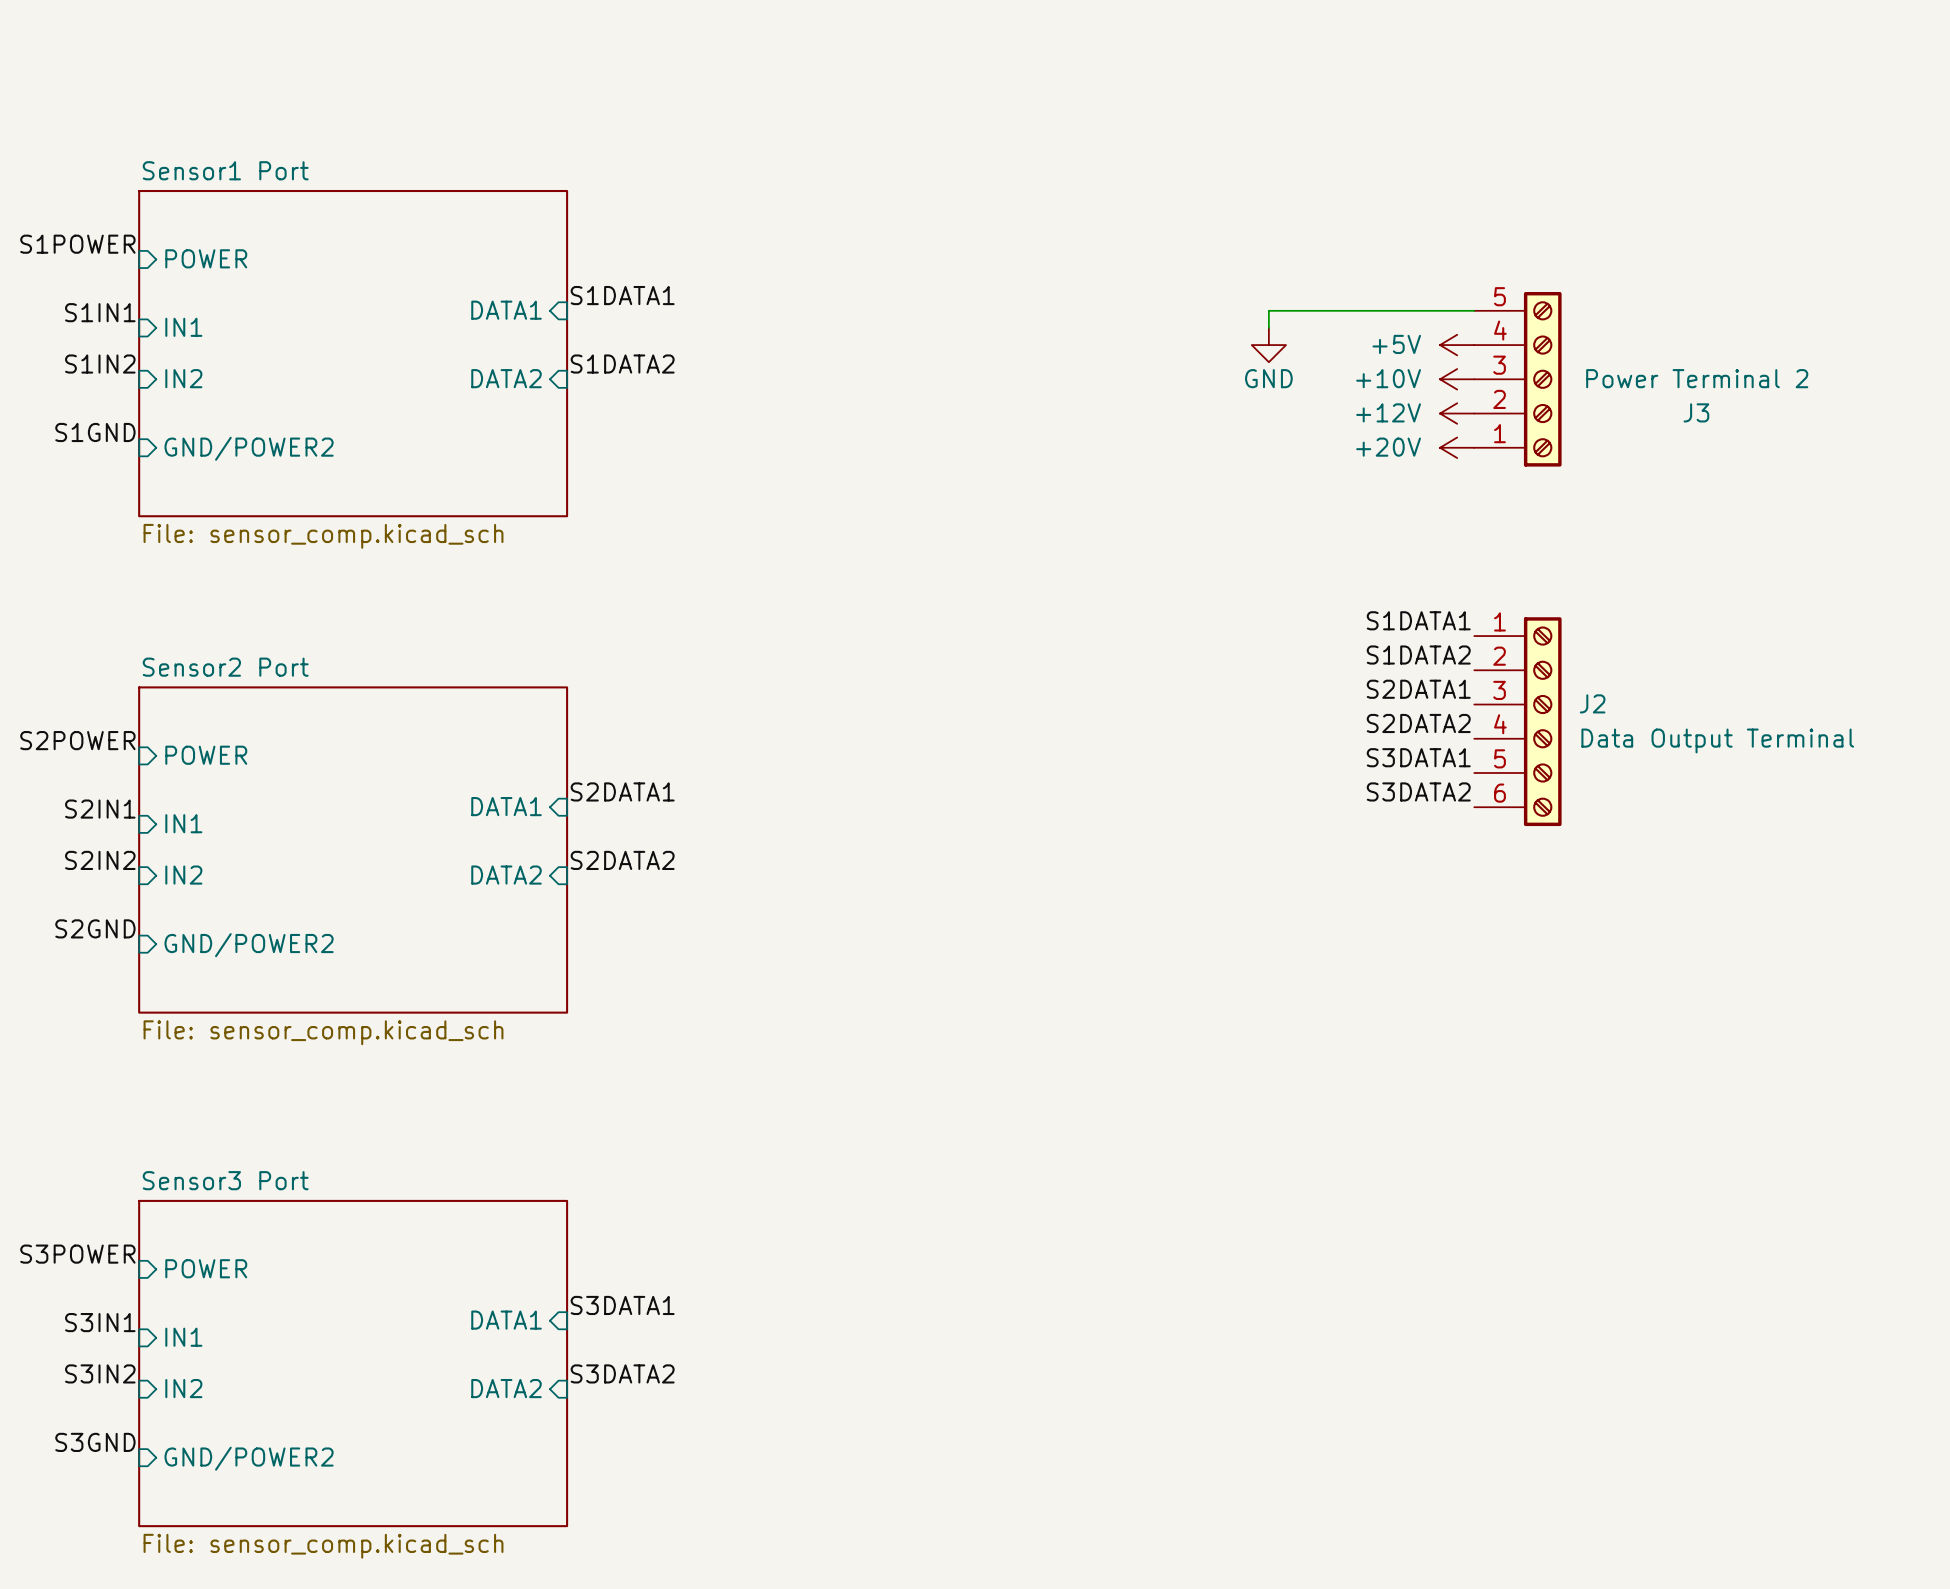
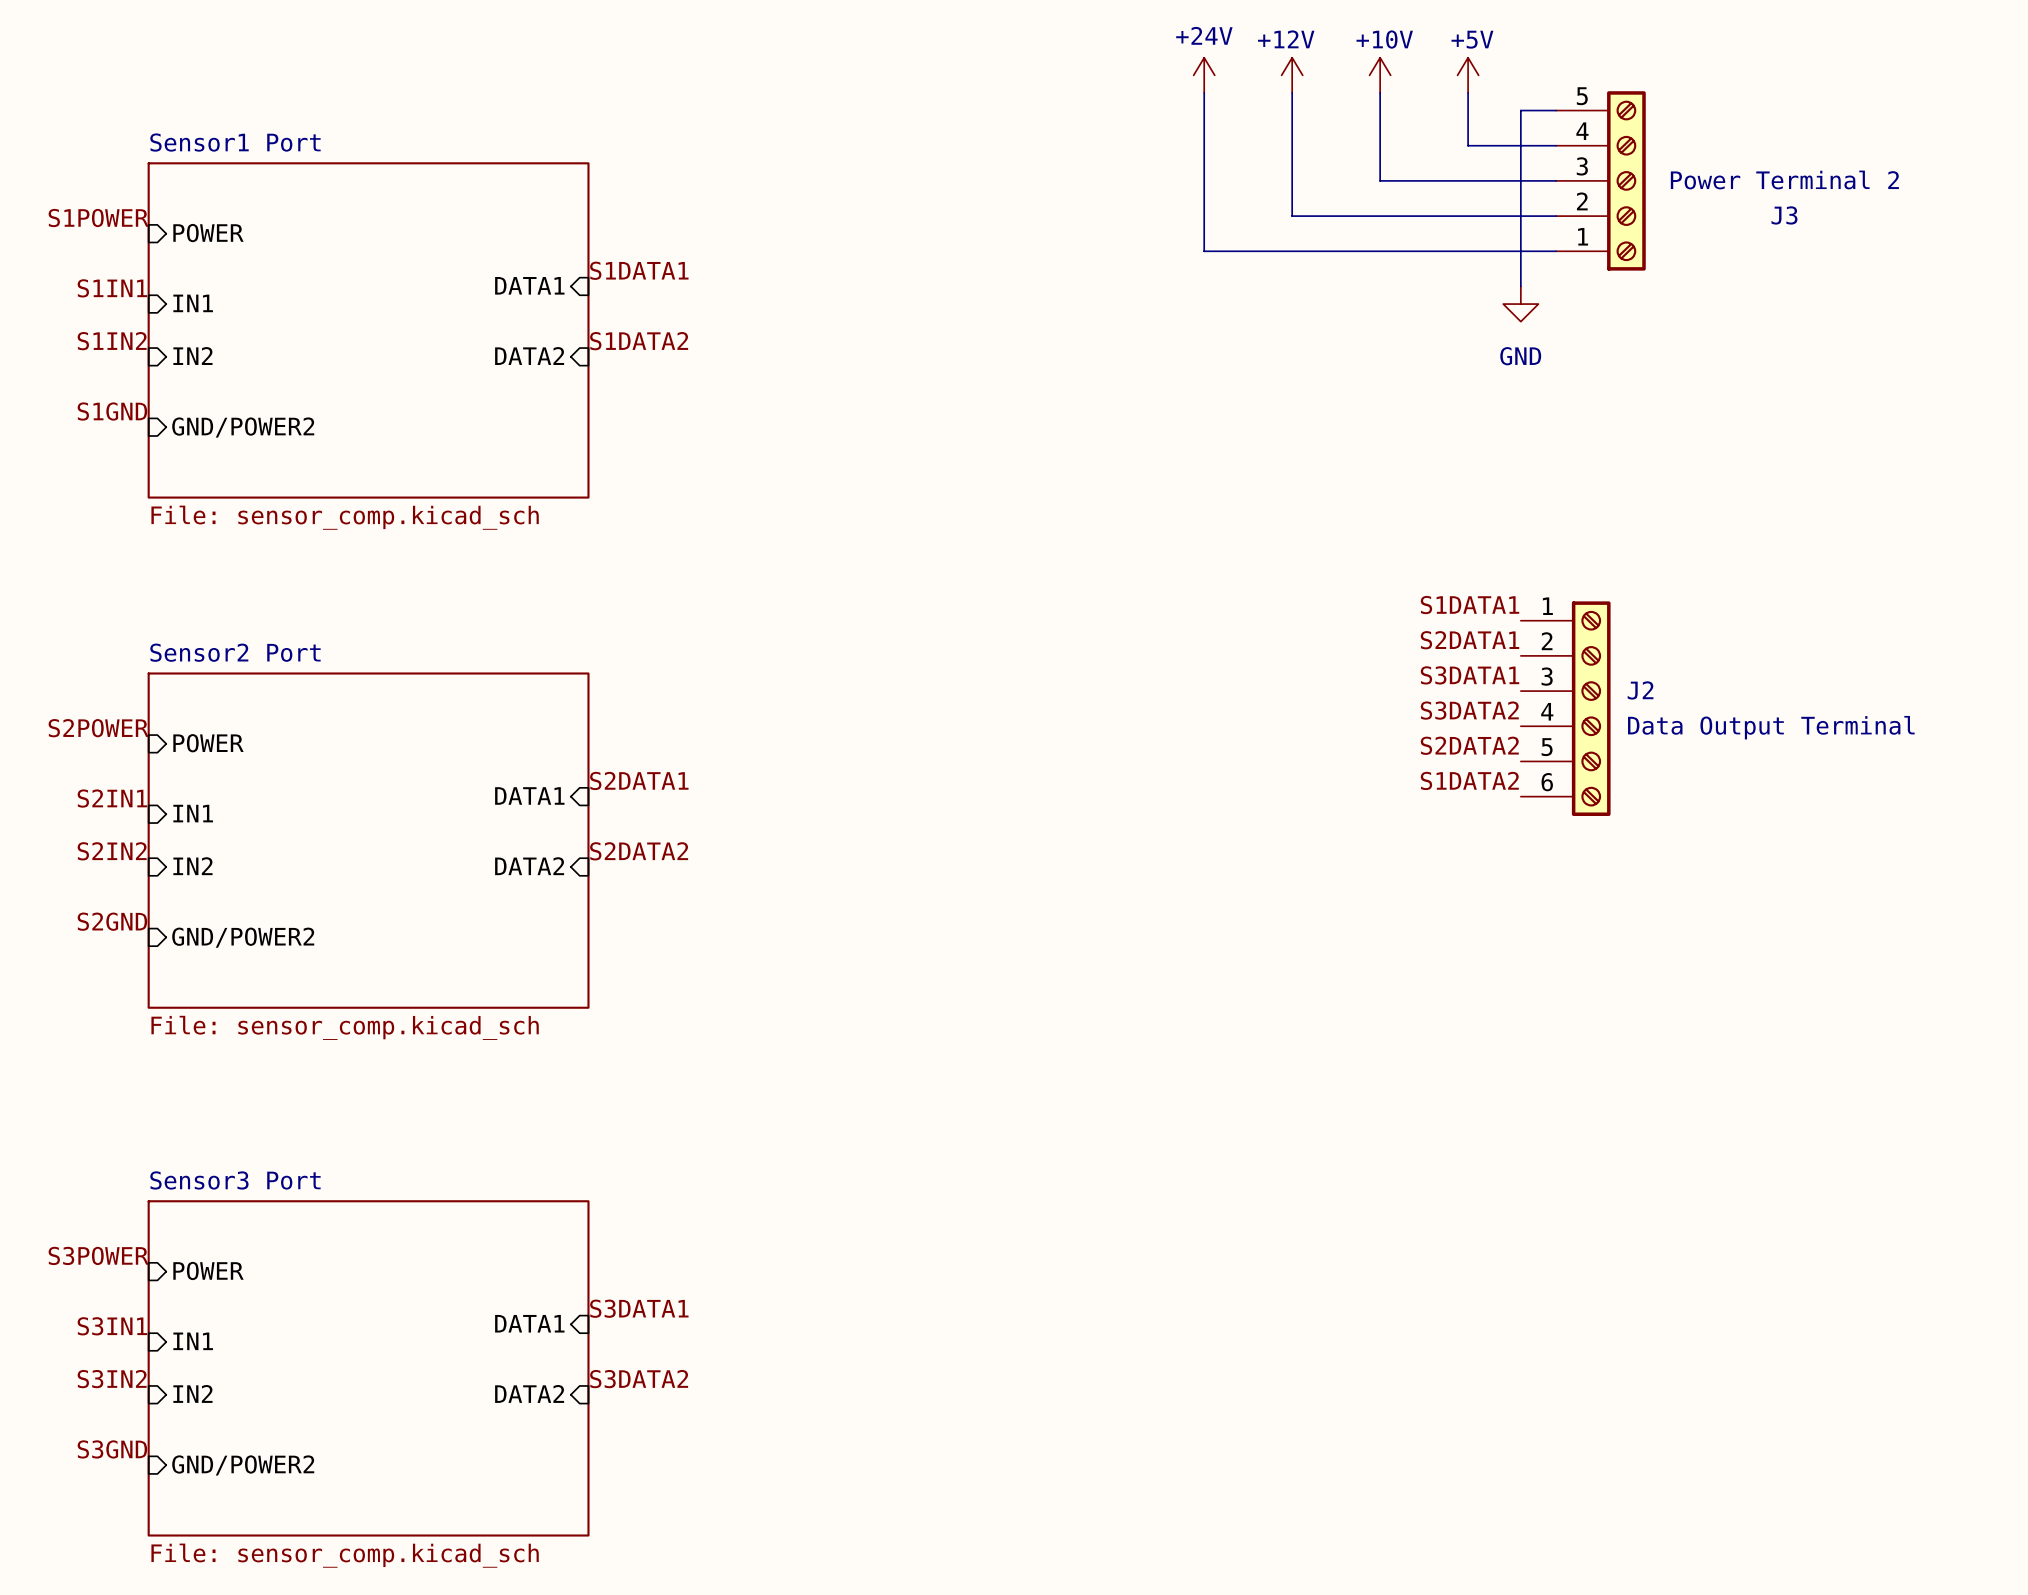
power symbol: none -> +24V (1204, 75)
power symbol: none -> +12V (1292, 75)
wire: none -> (1204, 92) (1204, 251) (1556, 251)
wire: none -> (1292, 92) (1292, 216) (1556, 216)
wire: none -> (1380, 92) (1380, 180) (1556, 180)
wire: none -> (1468, 92) (1468, 145) (1556, 145)
wire: (1474, 310) (1268, 310) (1268, 327) -> (1520, 286) (1520, 110) (1556, 110)
power symbol text position: +5V (1396, 344) -> +5V (1472, 39)
power symbol position: GND (1268, 345) -> GND (1520, 304)
power symbol rotation: 0° (1457, 345) -> 90° clockwise (1468, 75)
power symbol position: +5V (1457, 345) -> +5V (1468, 75)
power symbol text position: GND (1268, 378) -> GND (1520, 356)
power symbol text position: +10V (1388, 378) -> +10V (1384, 39)
power symbol rotation: 0° (1457, 379) -> 90° clockwise (1380, 75)
power symbol position: +10V (1457, 379) -> +10V (1380, 75)
J3 position: (1517, 379) -> (1600, 180)
power symbol: +12V (1457, 413) -> none
power symbol: +20V (1457, 447) -> none
label: S1DATA2 (1418, 655) -> S2DATA1 (1470, 640)
label: S2DATA1 (1418, 689) -> S3DATA1 (1470, 675)
label: S2DATA2 (1418, 723) -> S3DATA2 (1469, 710)
label: S3DATA1 (1418, 757) -> S2DATA2 (1469, 745)
label: S3DATA2 (1418, 791) -> S1DATA2 (1469, 780)

